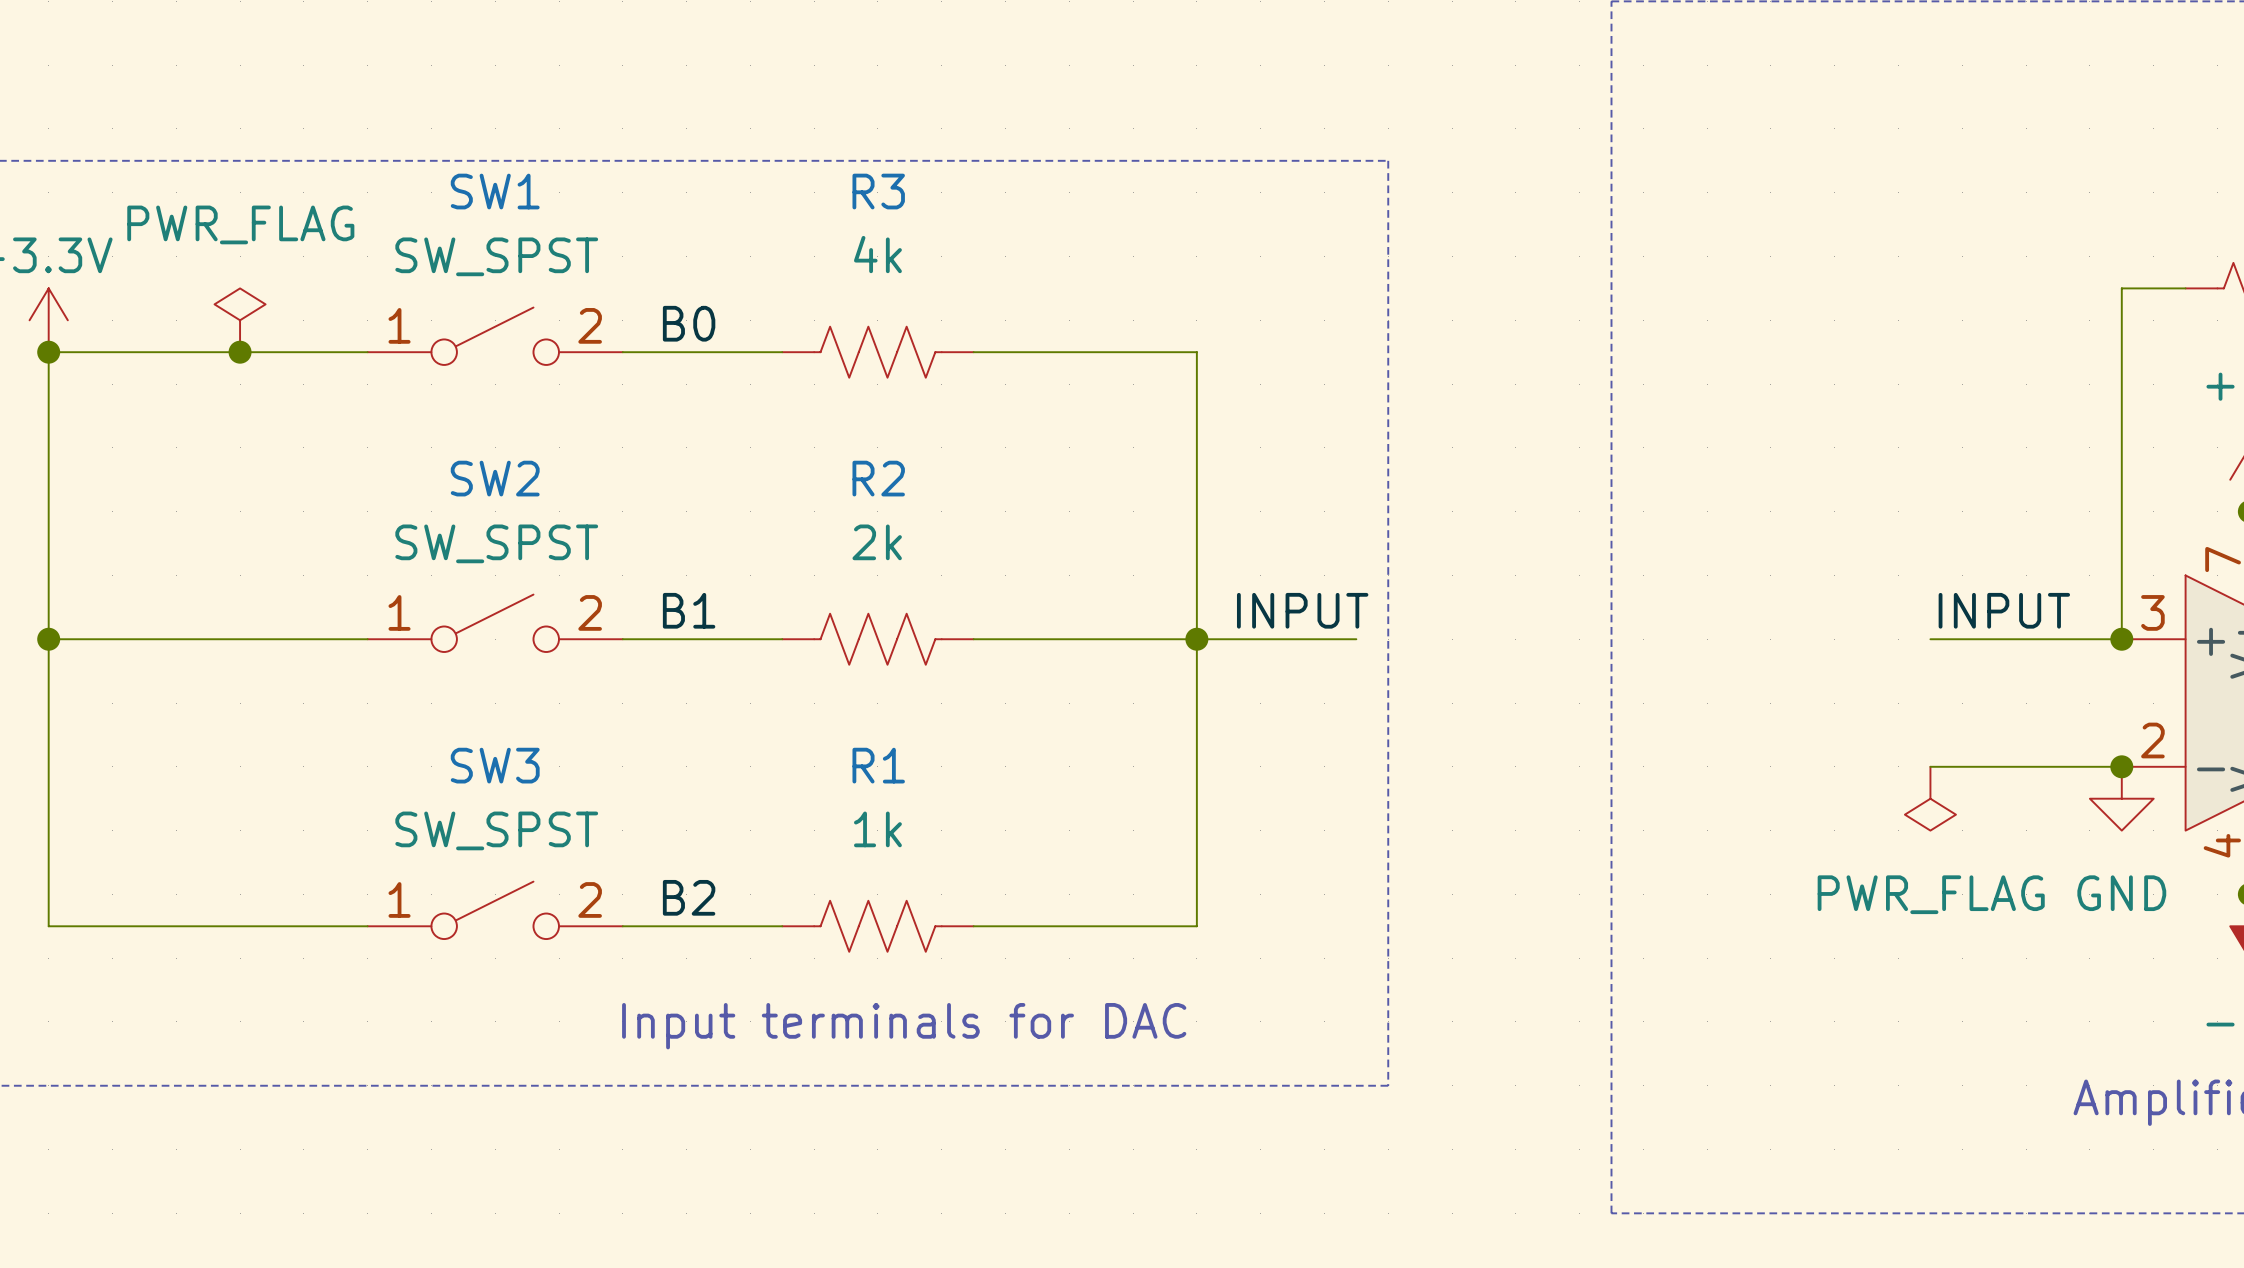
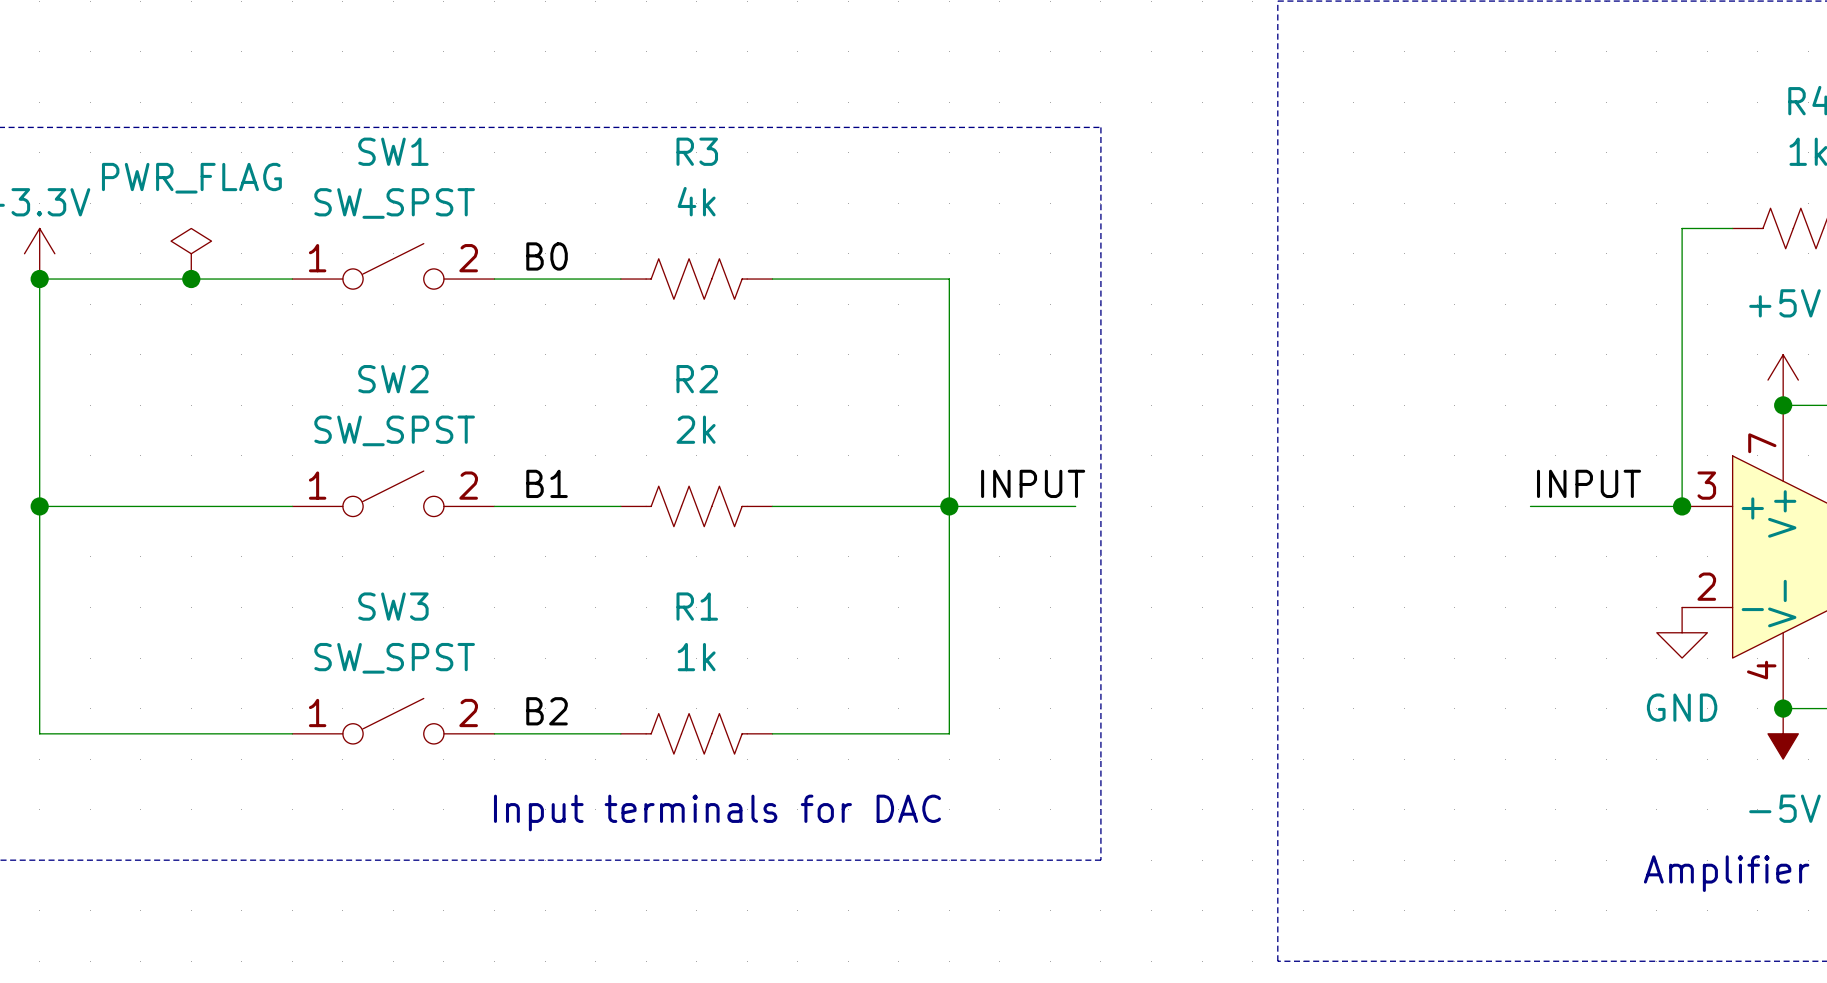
wire: (1930, 766) (2121, 766) -> none
junction: (2121, 766) -> none
power symbol: PWR_FLAG (1930, 798) -> none

